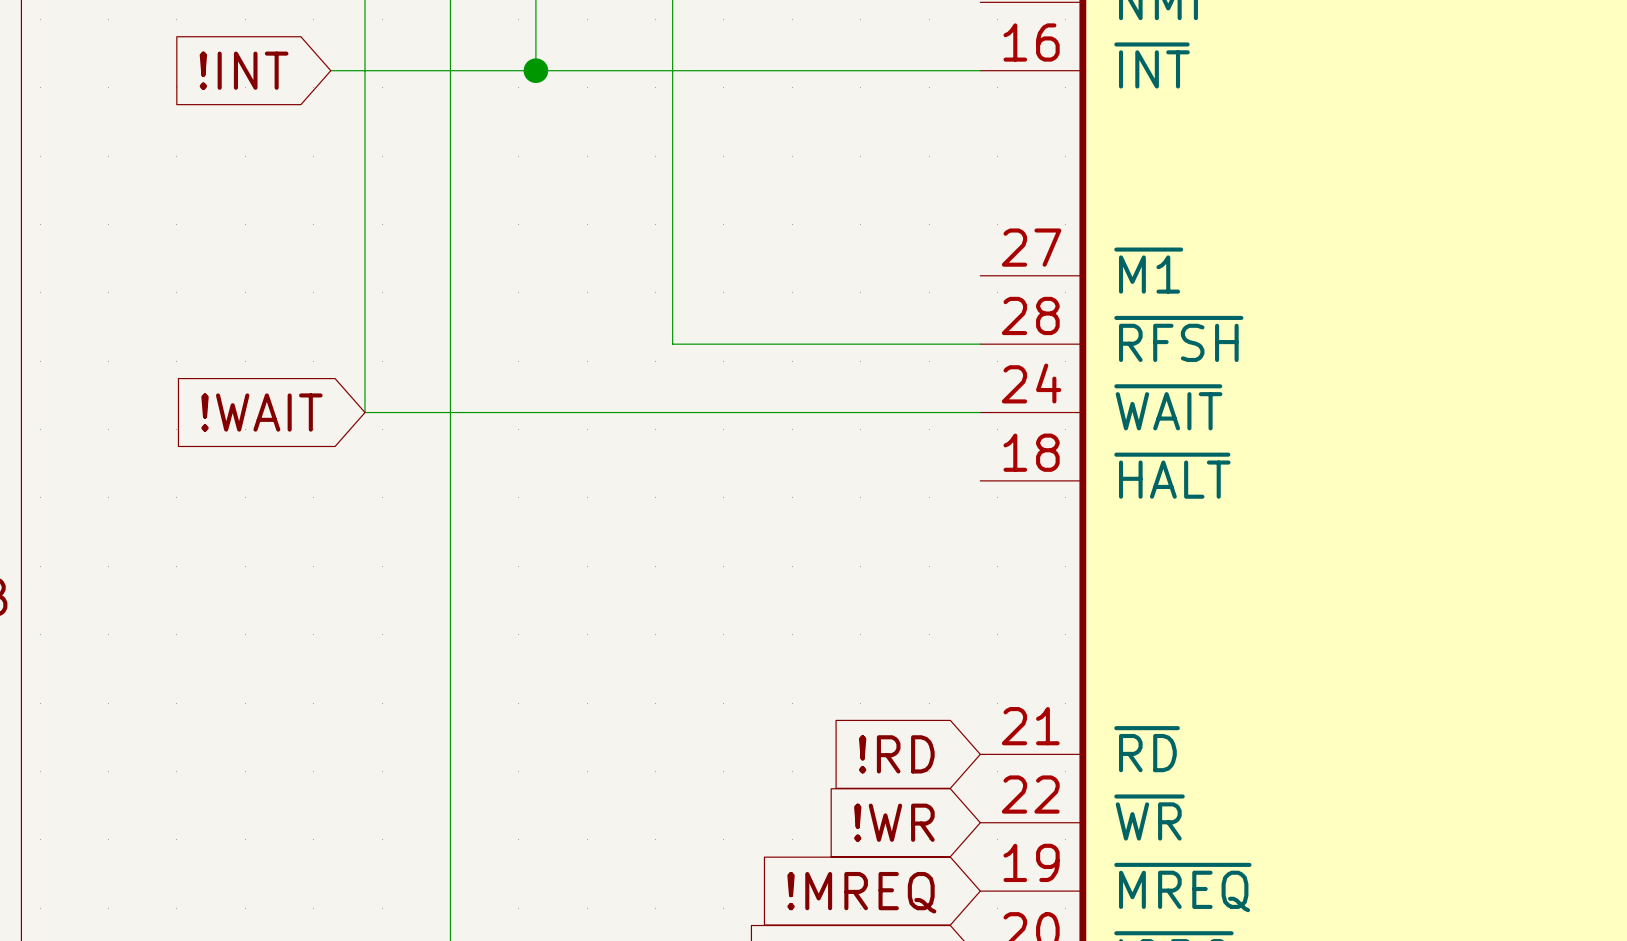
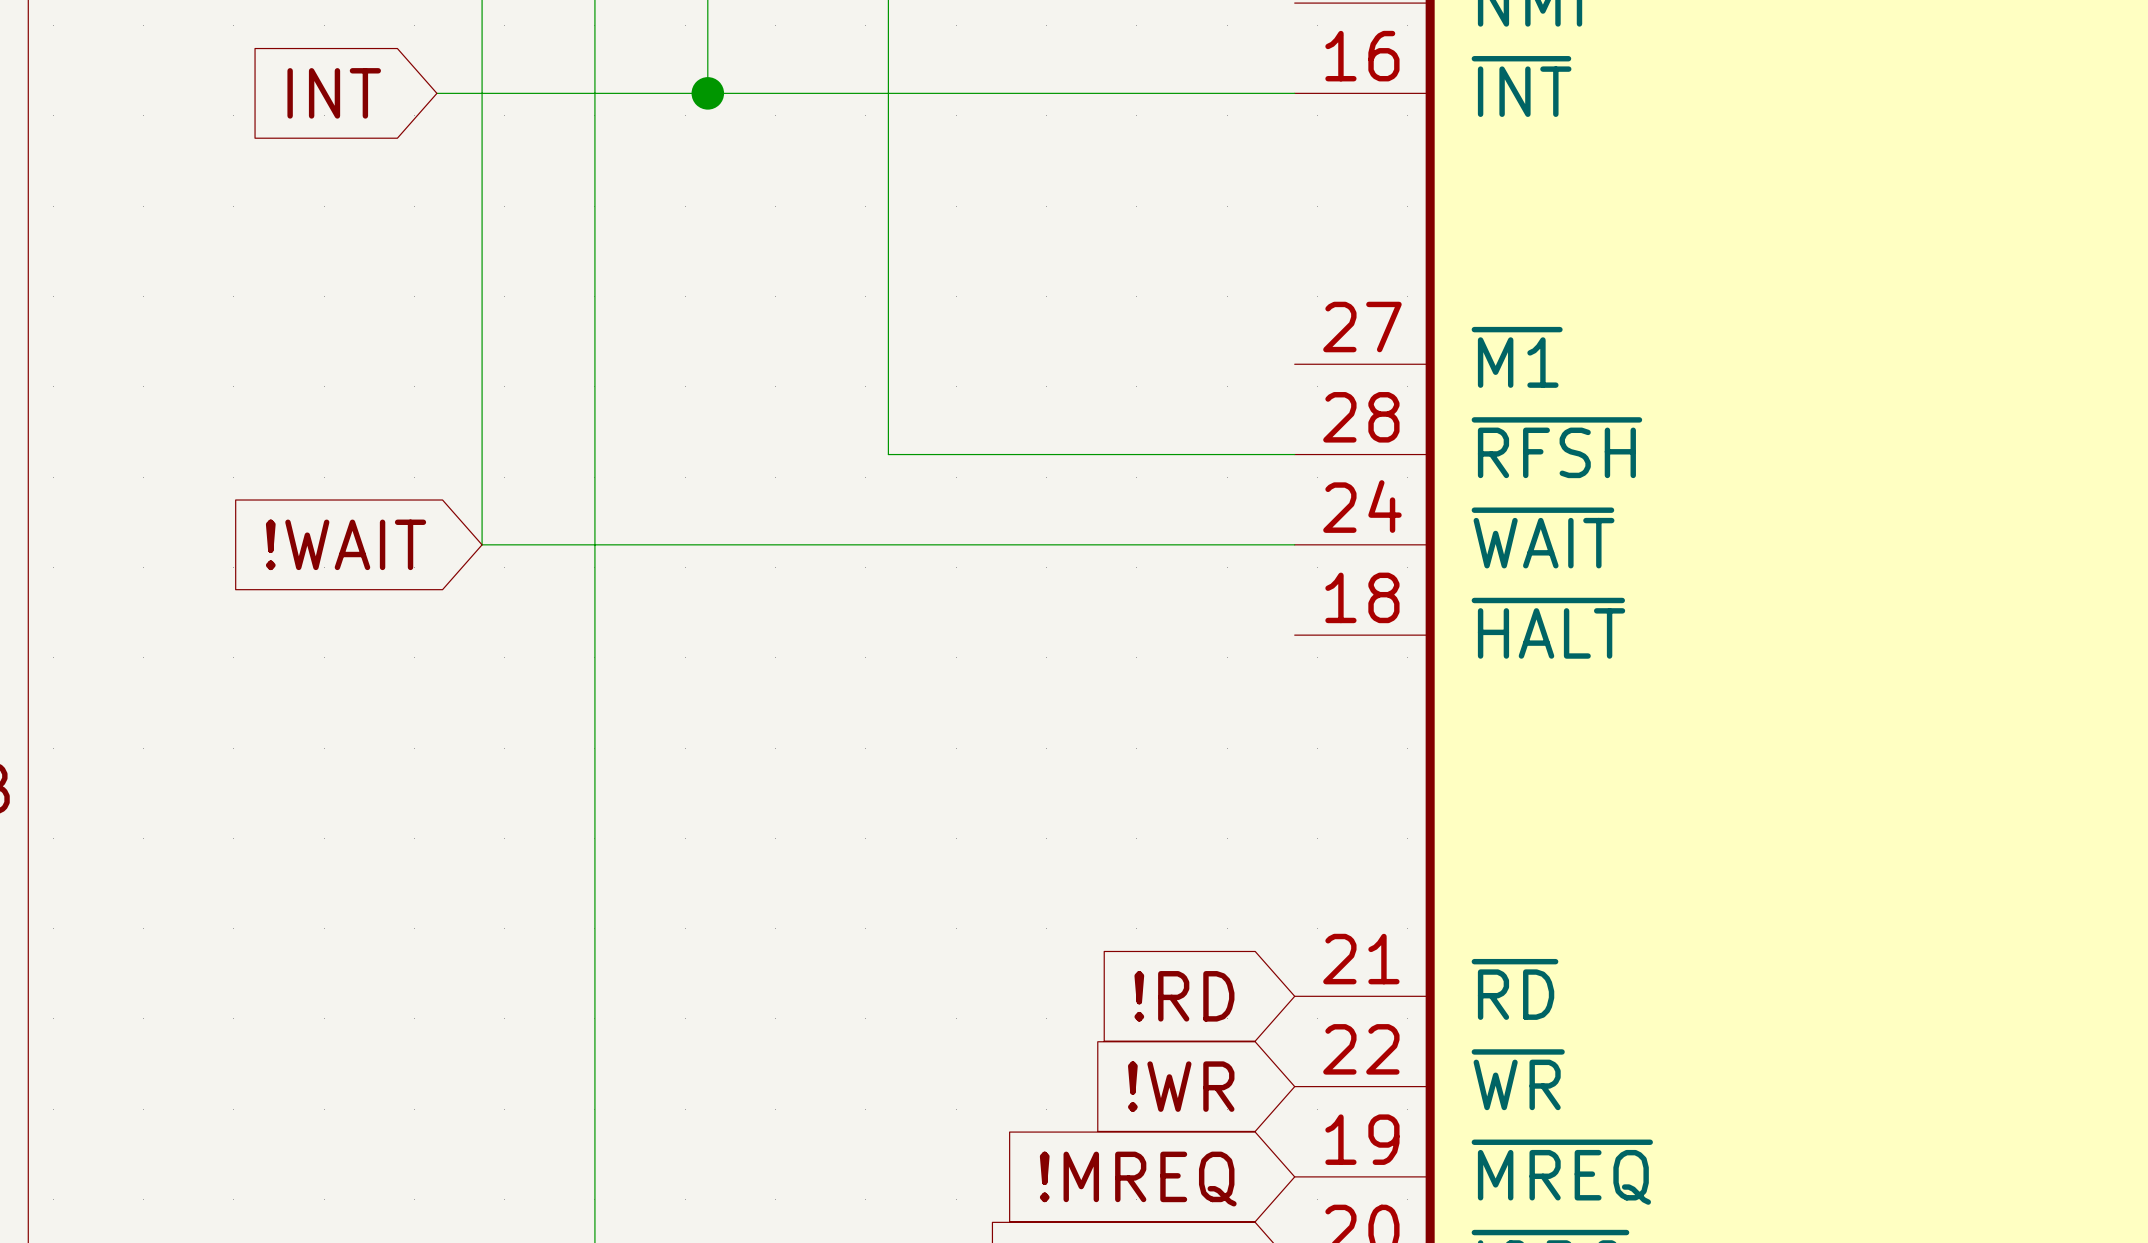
global label: !INT (244, 70) -> INT (334, 93)

